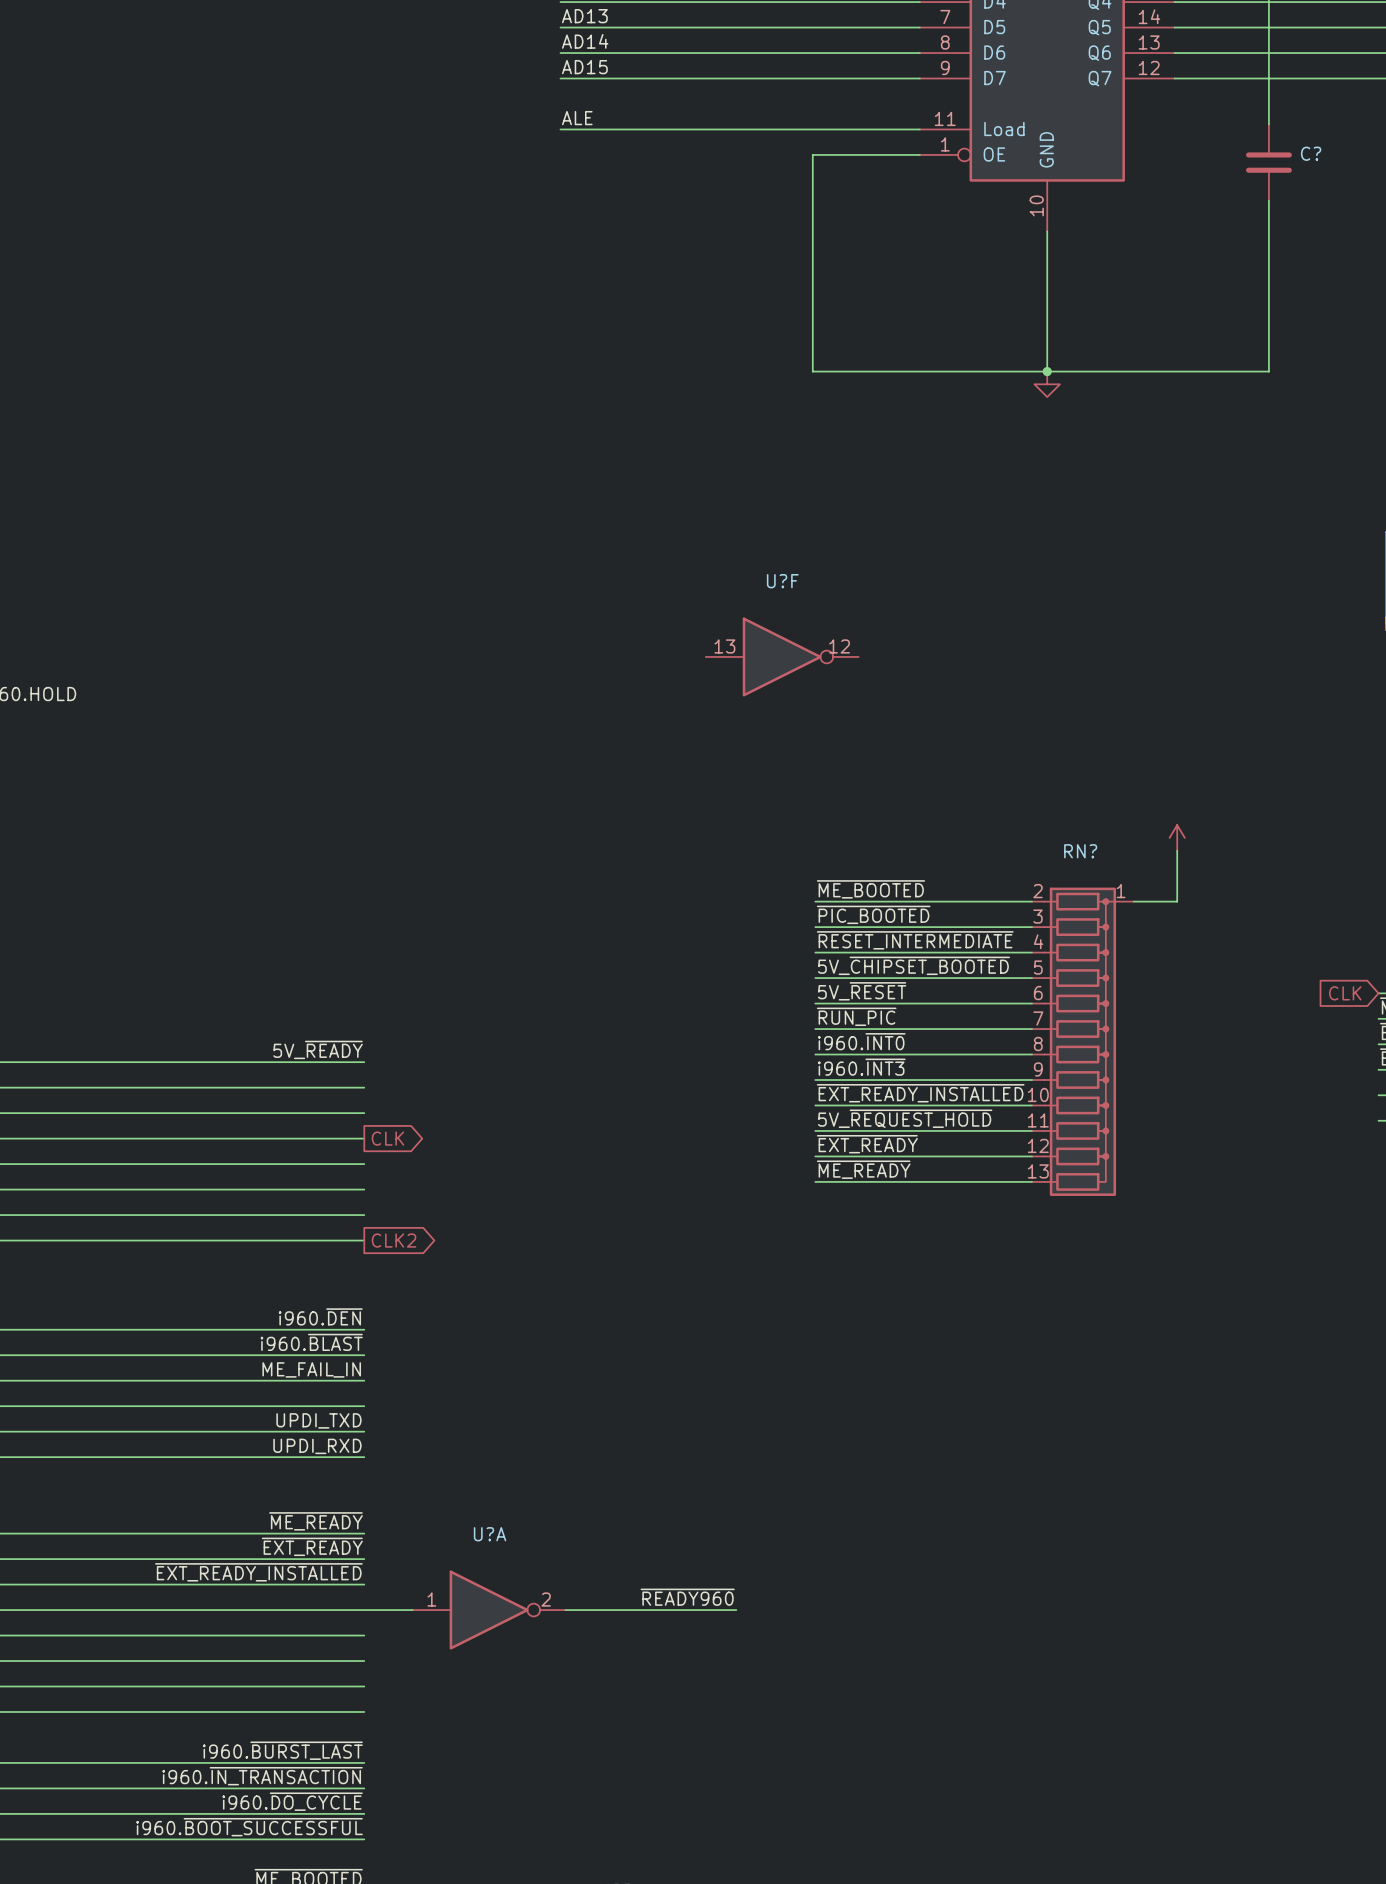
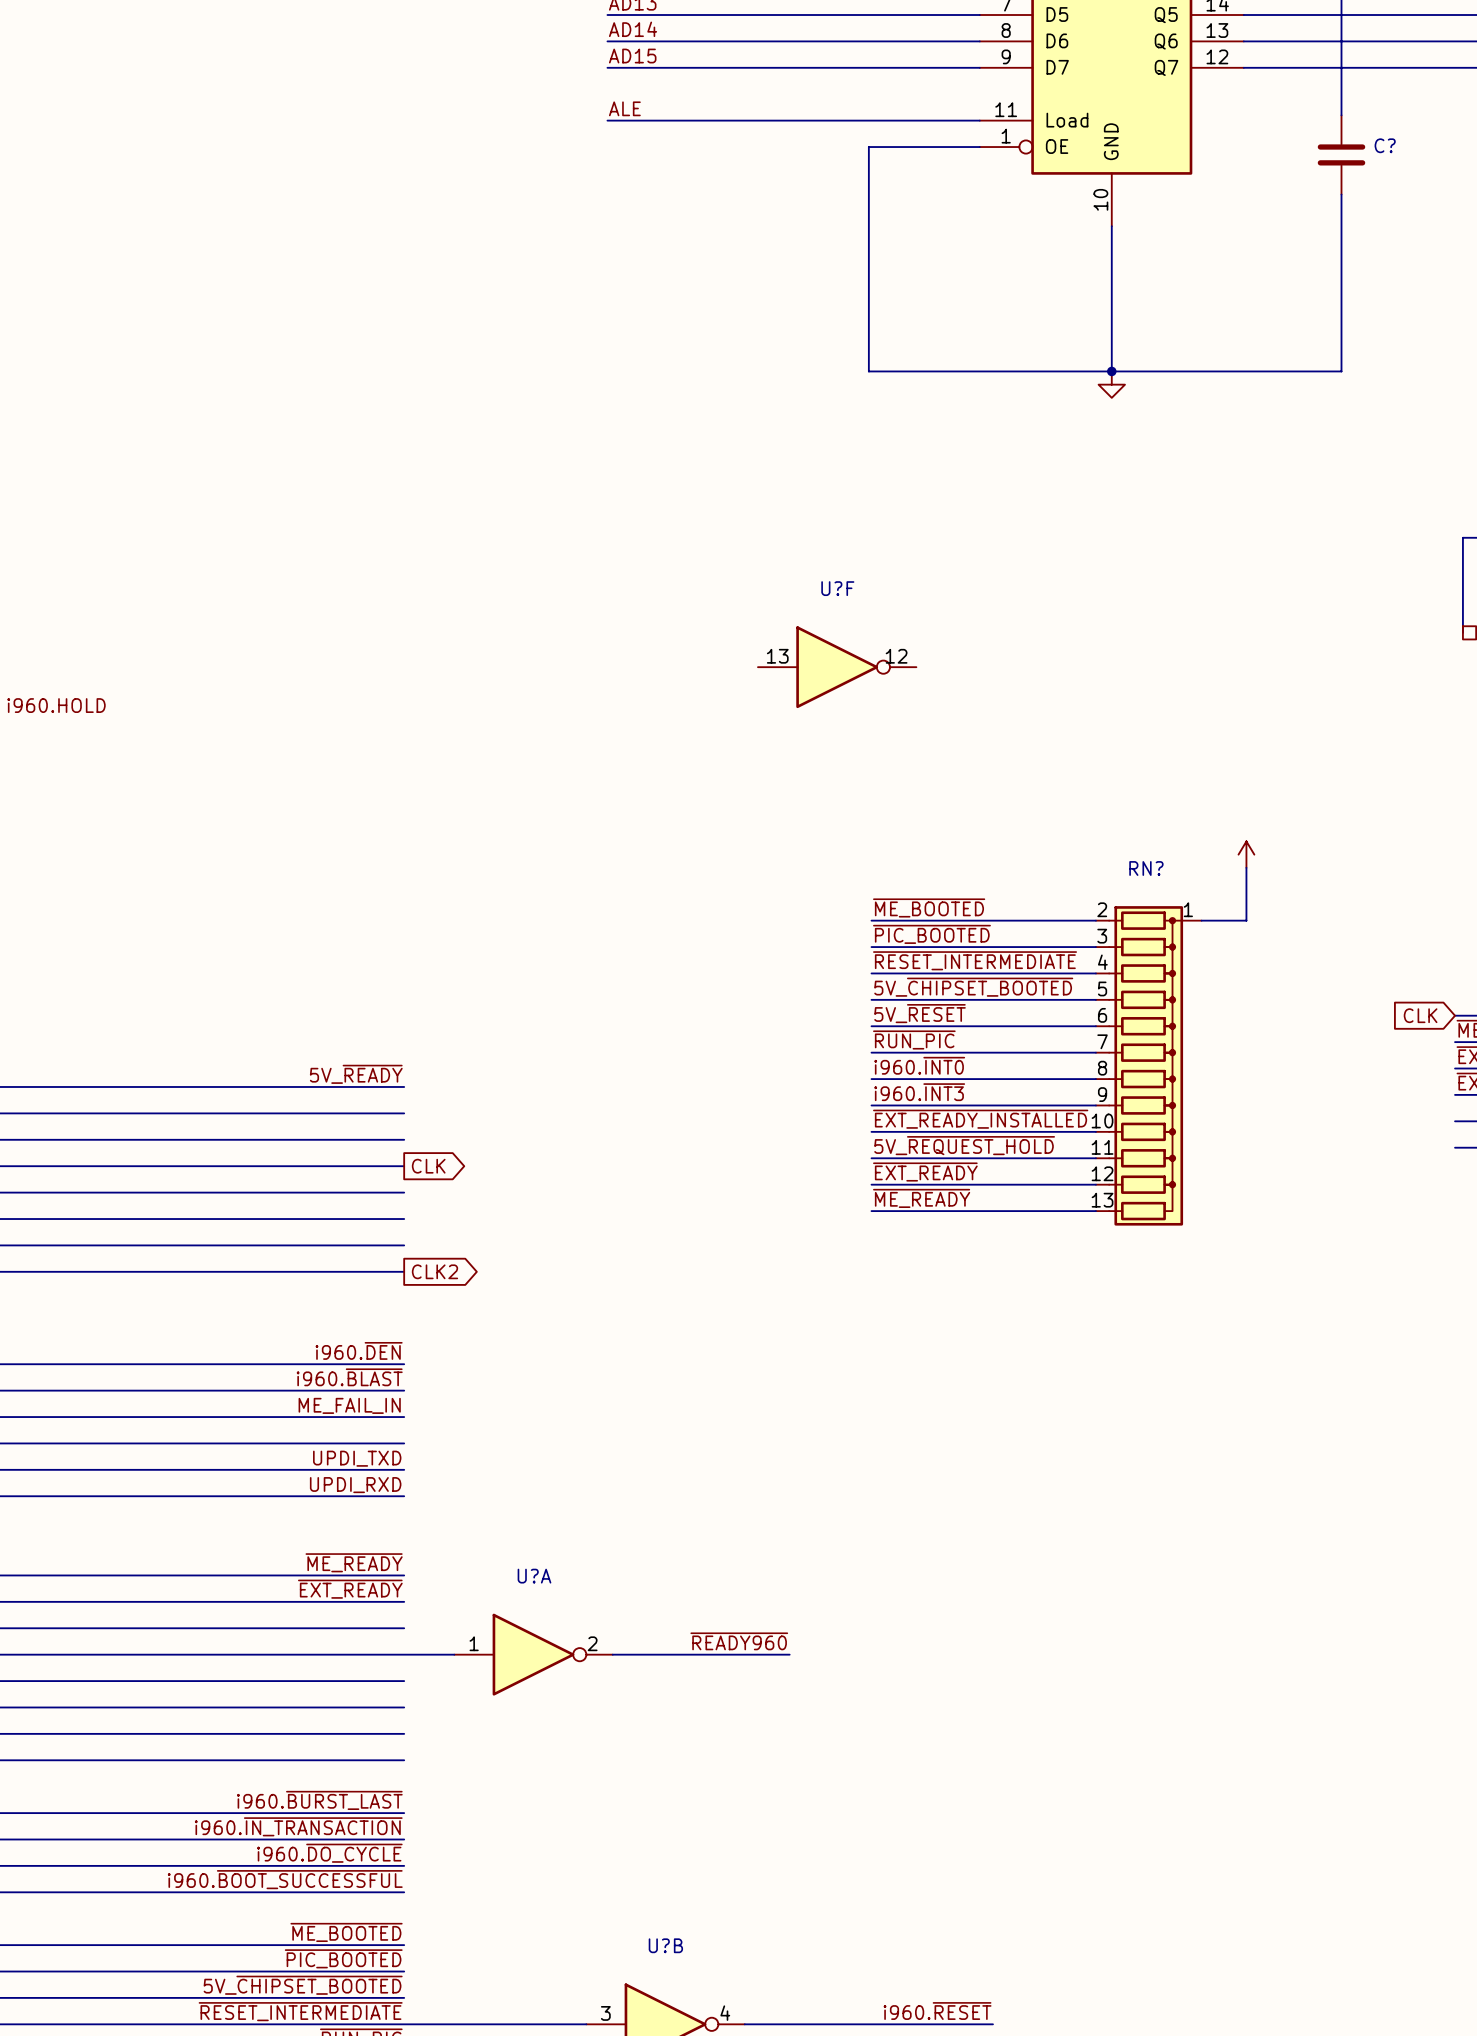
label: ~{EXT_READY_INSTALLED} (258, 1572) -> none

